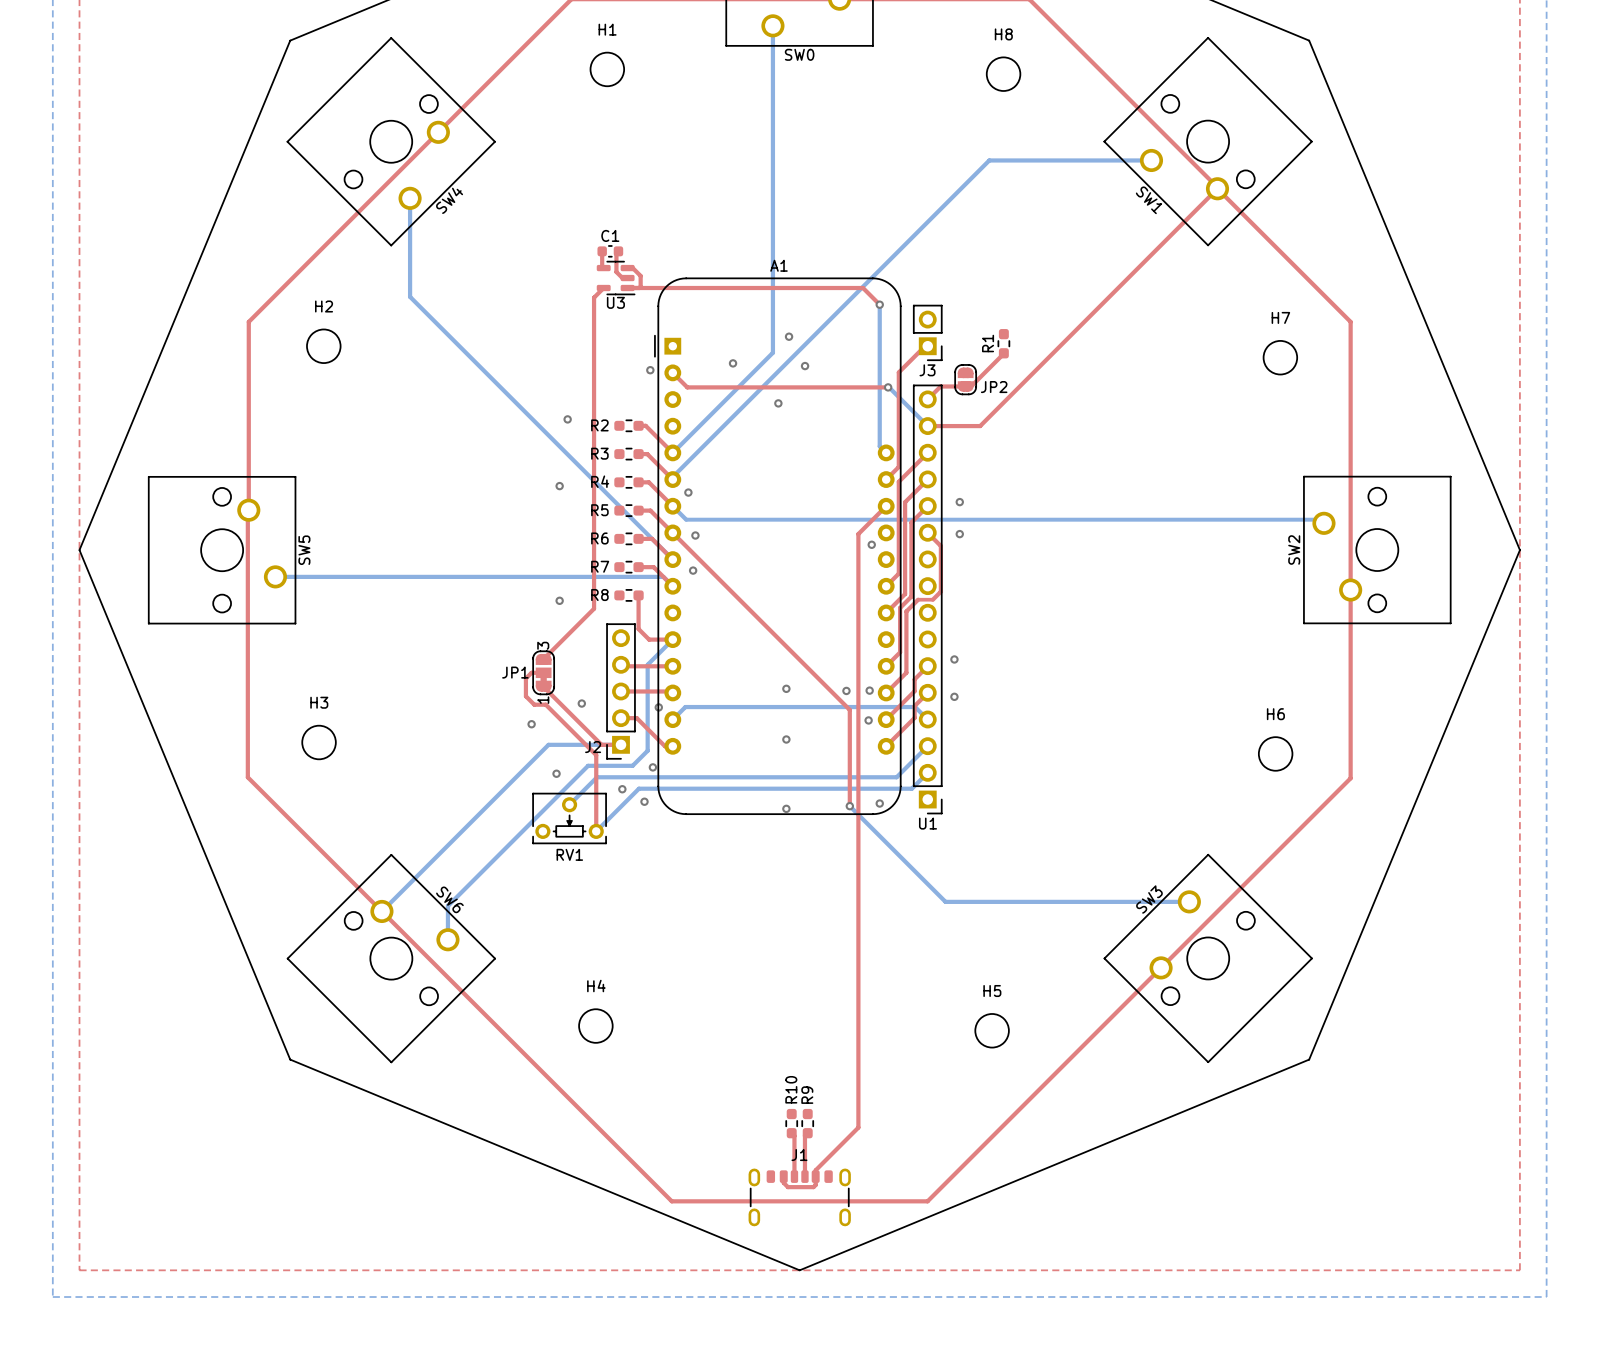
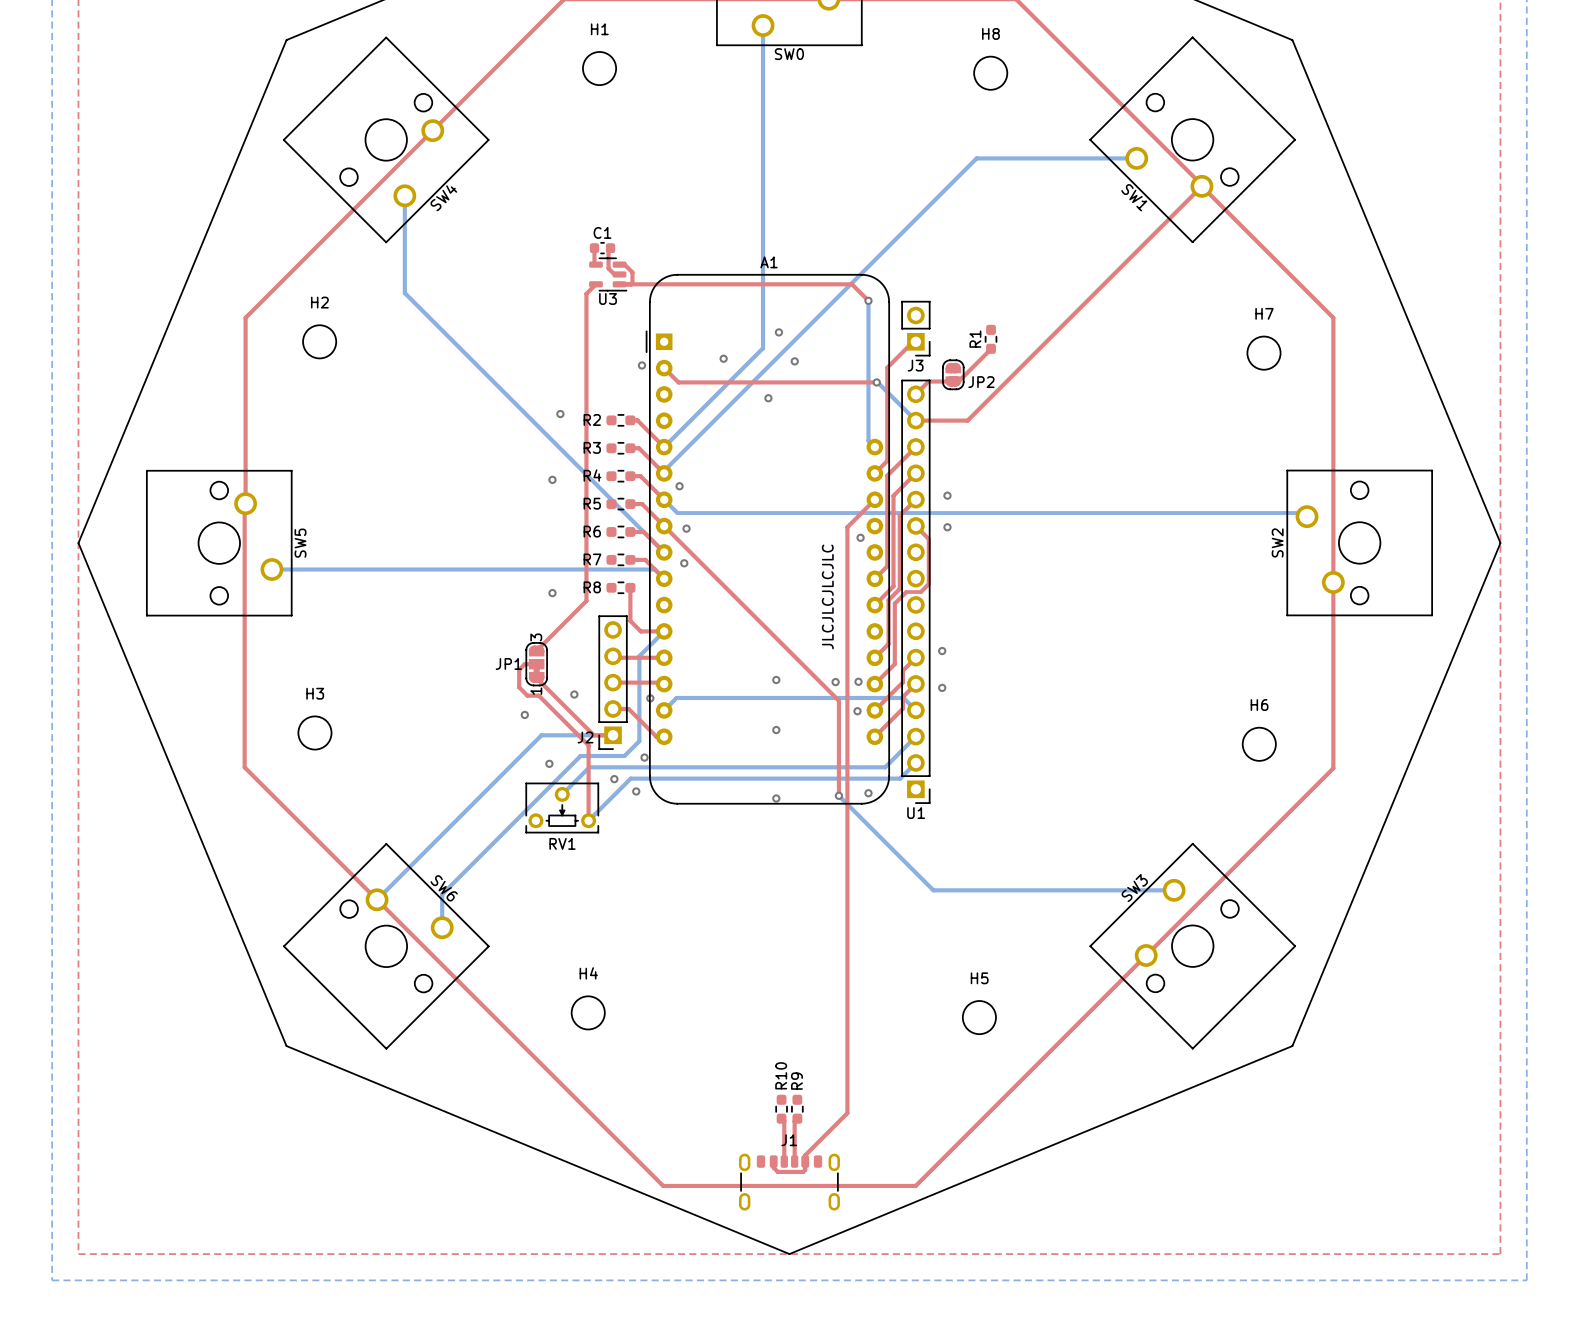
text: none -> JLCJLCJLCJLC (827, 596)

